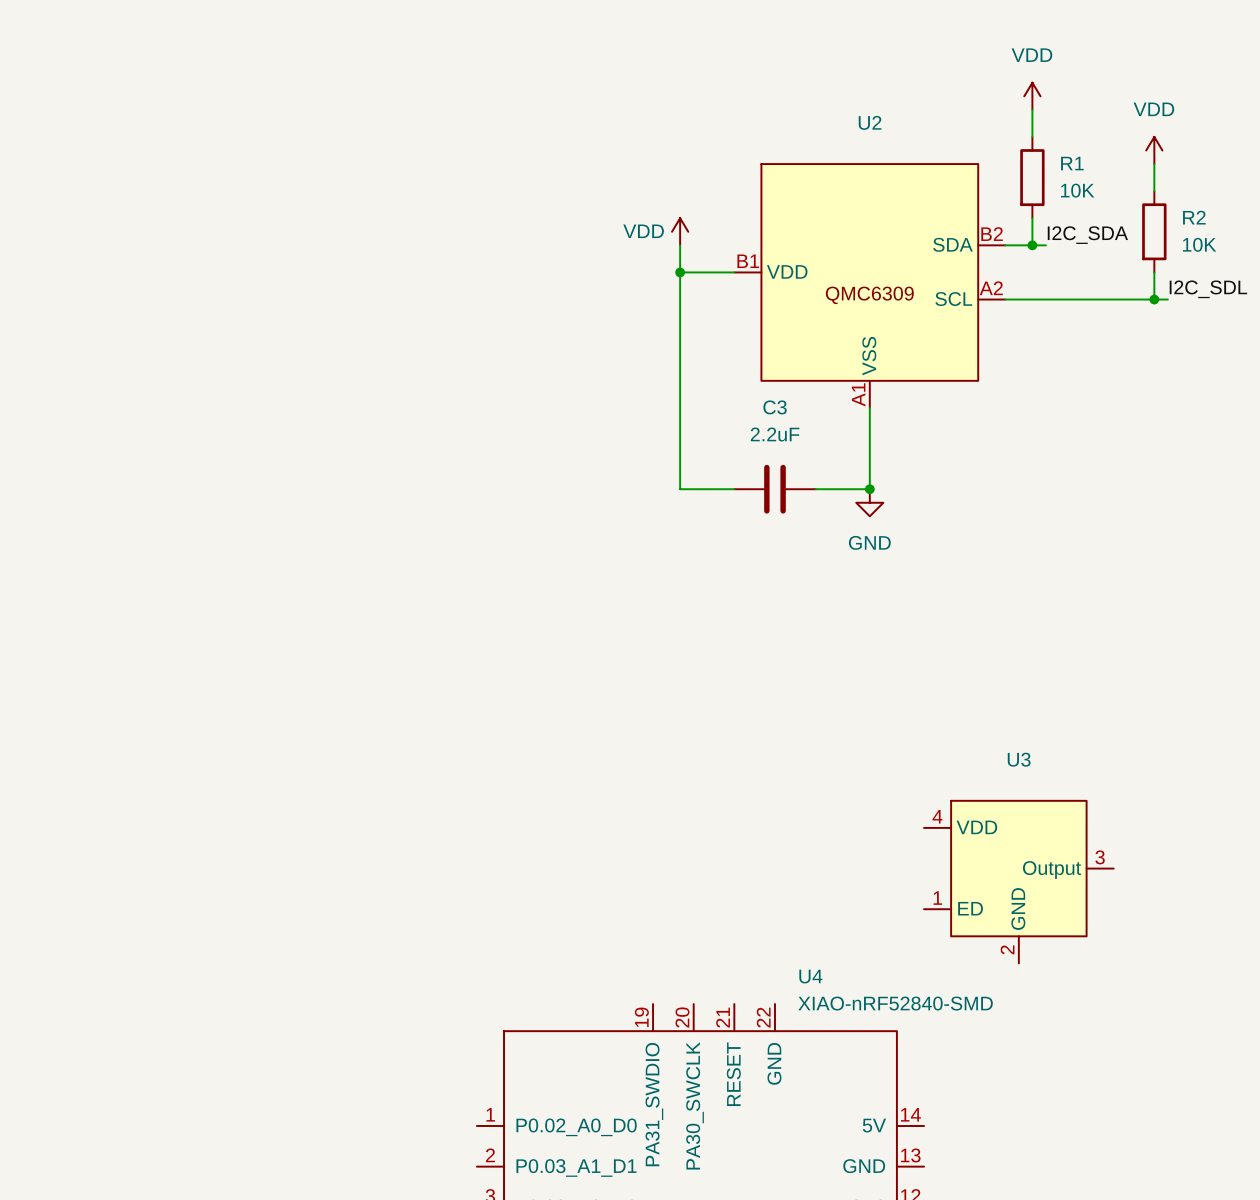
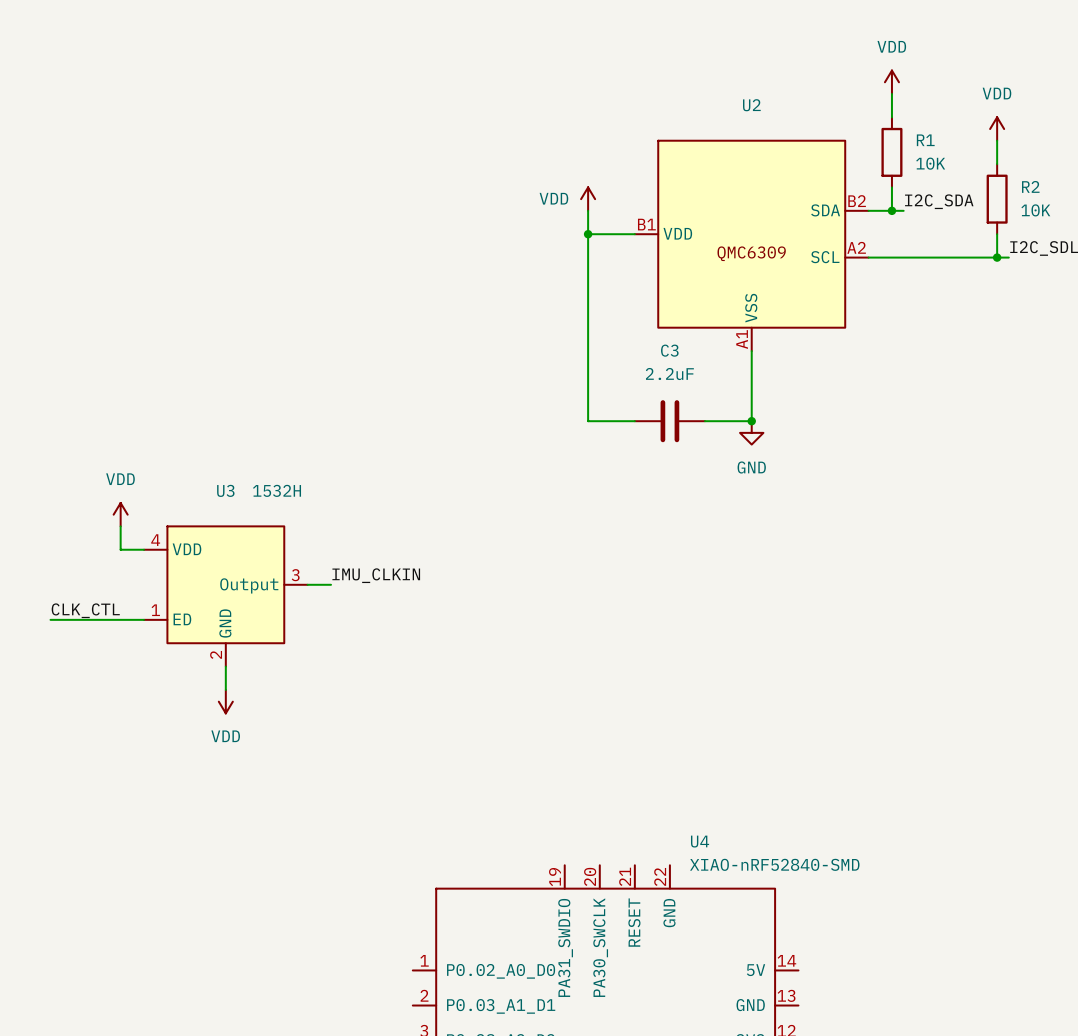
U3 value: none -> 1532H (277, 490)
power symbol: none -> VDD (120, 514)
wire: none -> (120, 526) (120, 549) (144, 549)
label: none -> IMU_CLKIN (376, 575)
wire: none -> (307, 584) (331, 584)
label: none -> CLK_CTL (85, 610)
wire: none -> (50, 619) (144, 619)
wire: none -> (225, 666) (225, 689)
power symbol: none -> VDD (225, 701)
U3 position: (1018, 882) -> (225, 596)

